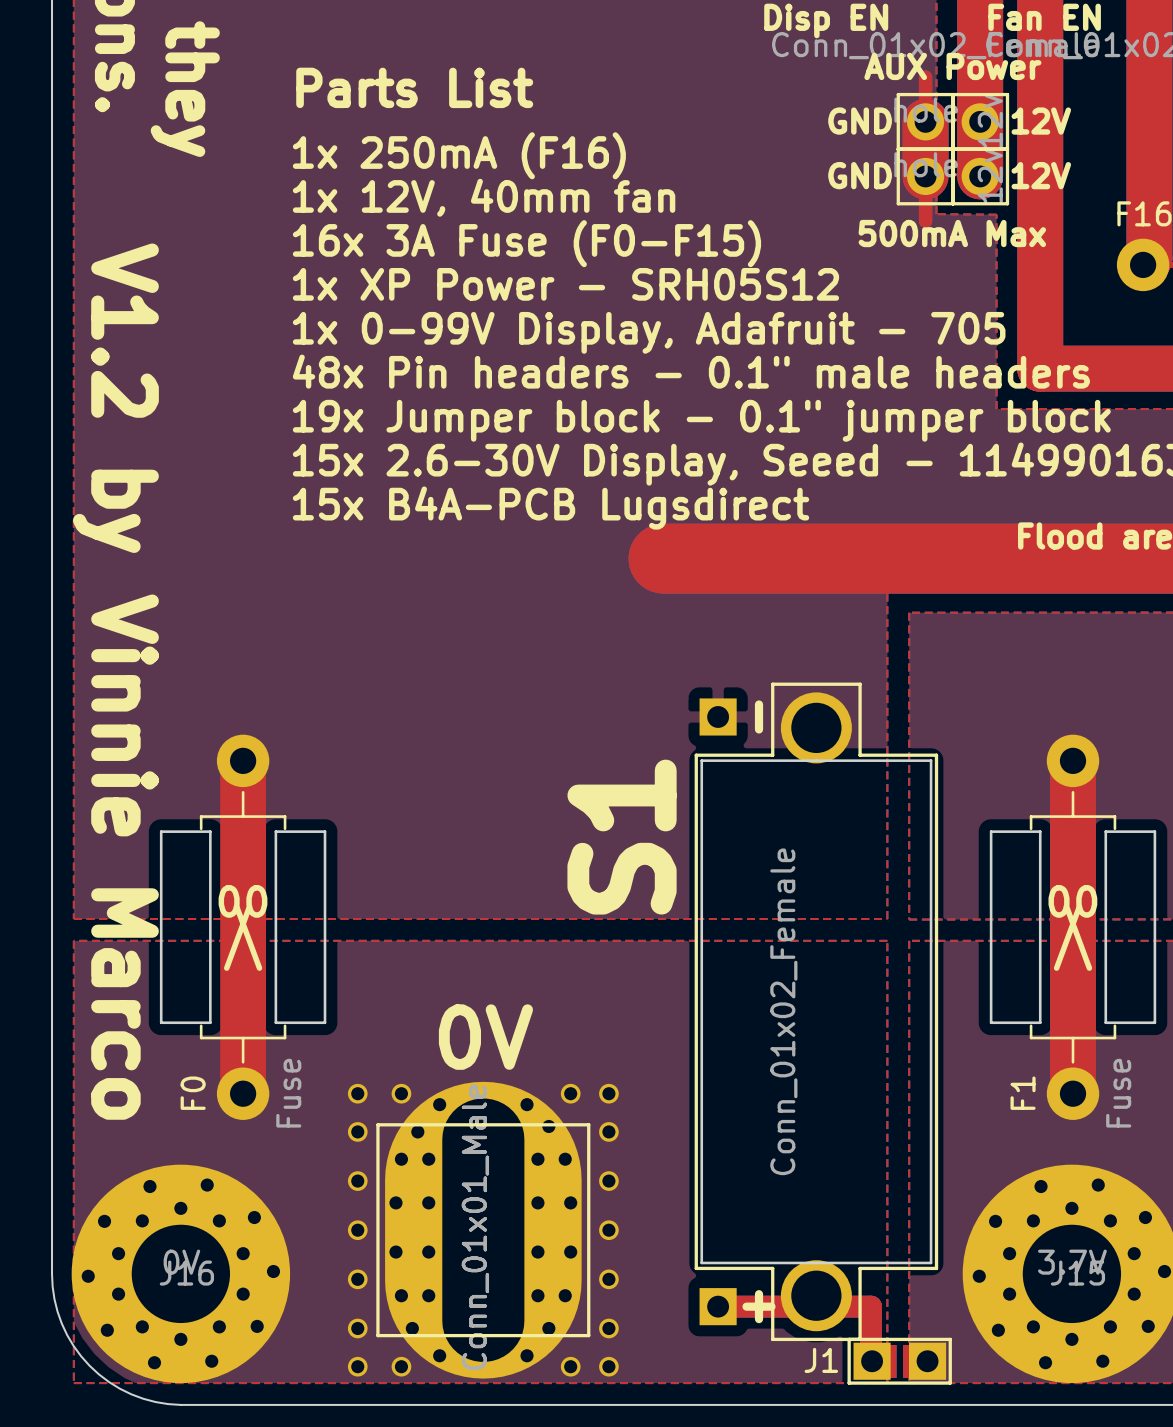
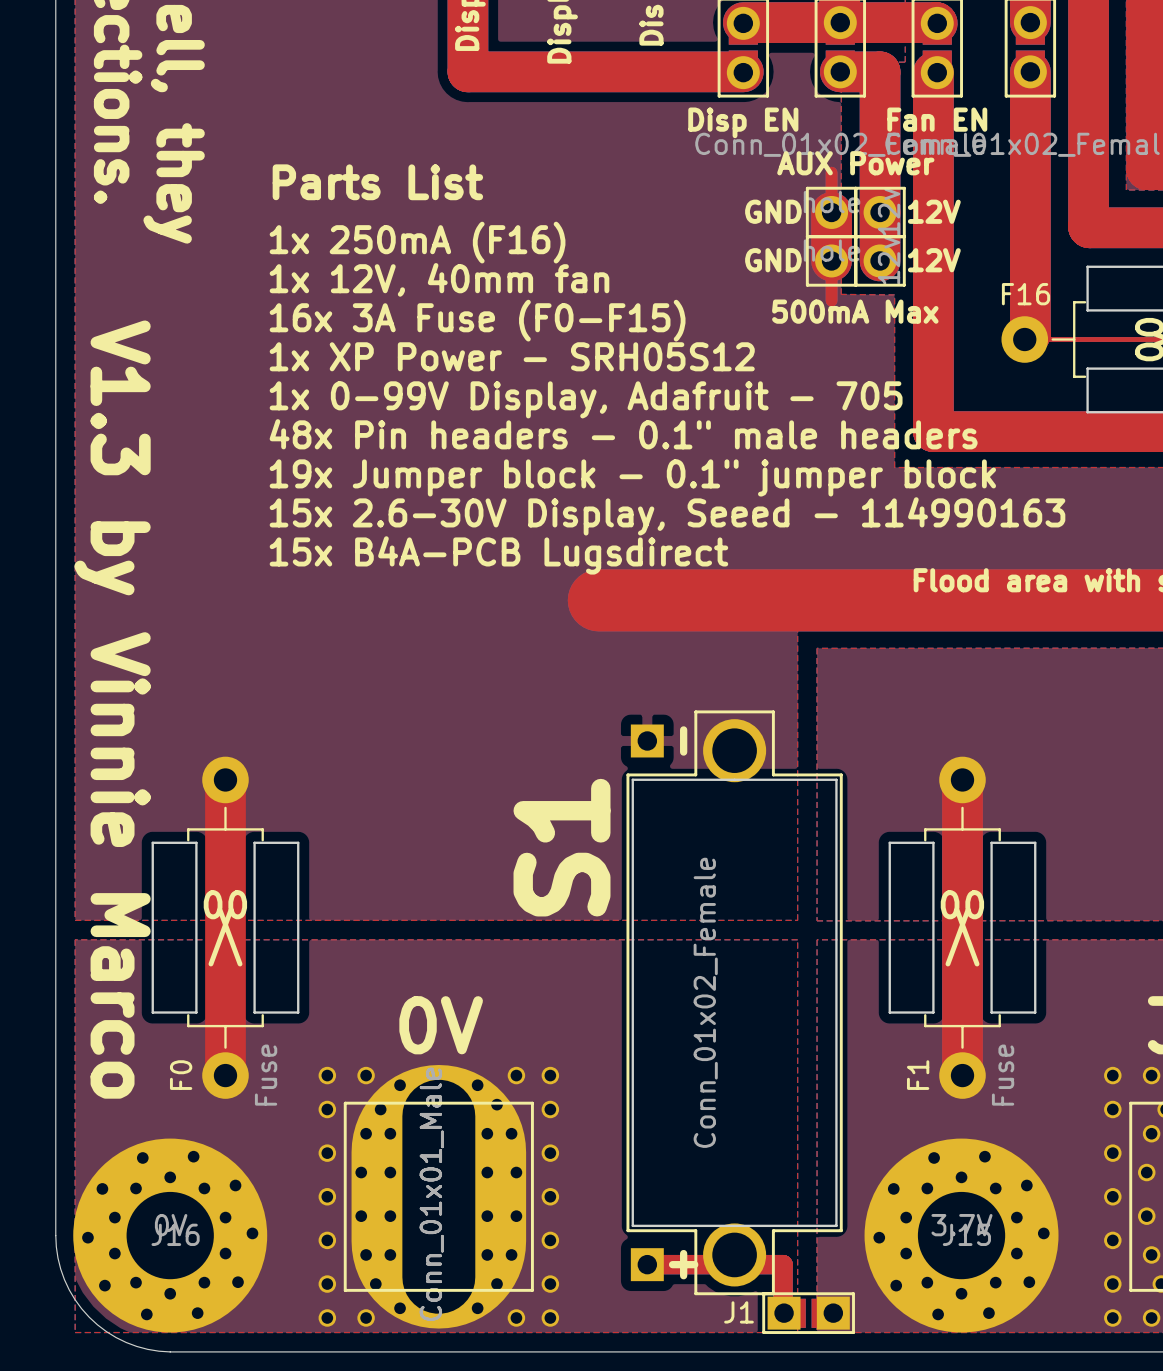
text: V1.2 by Vinnie Marco (115, 681) -> V1.3 by Vinnie Marco (112, 709)

